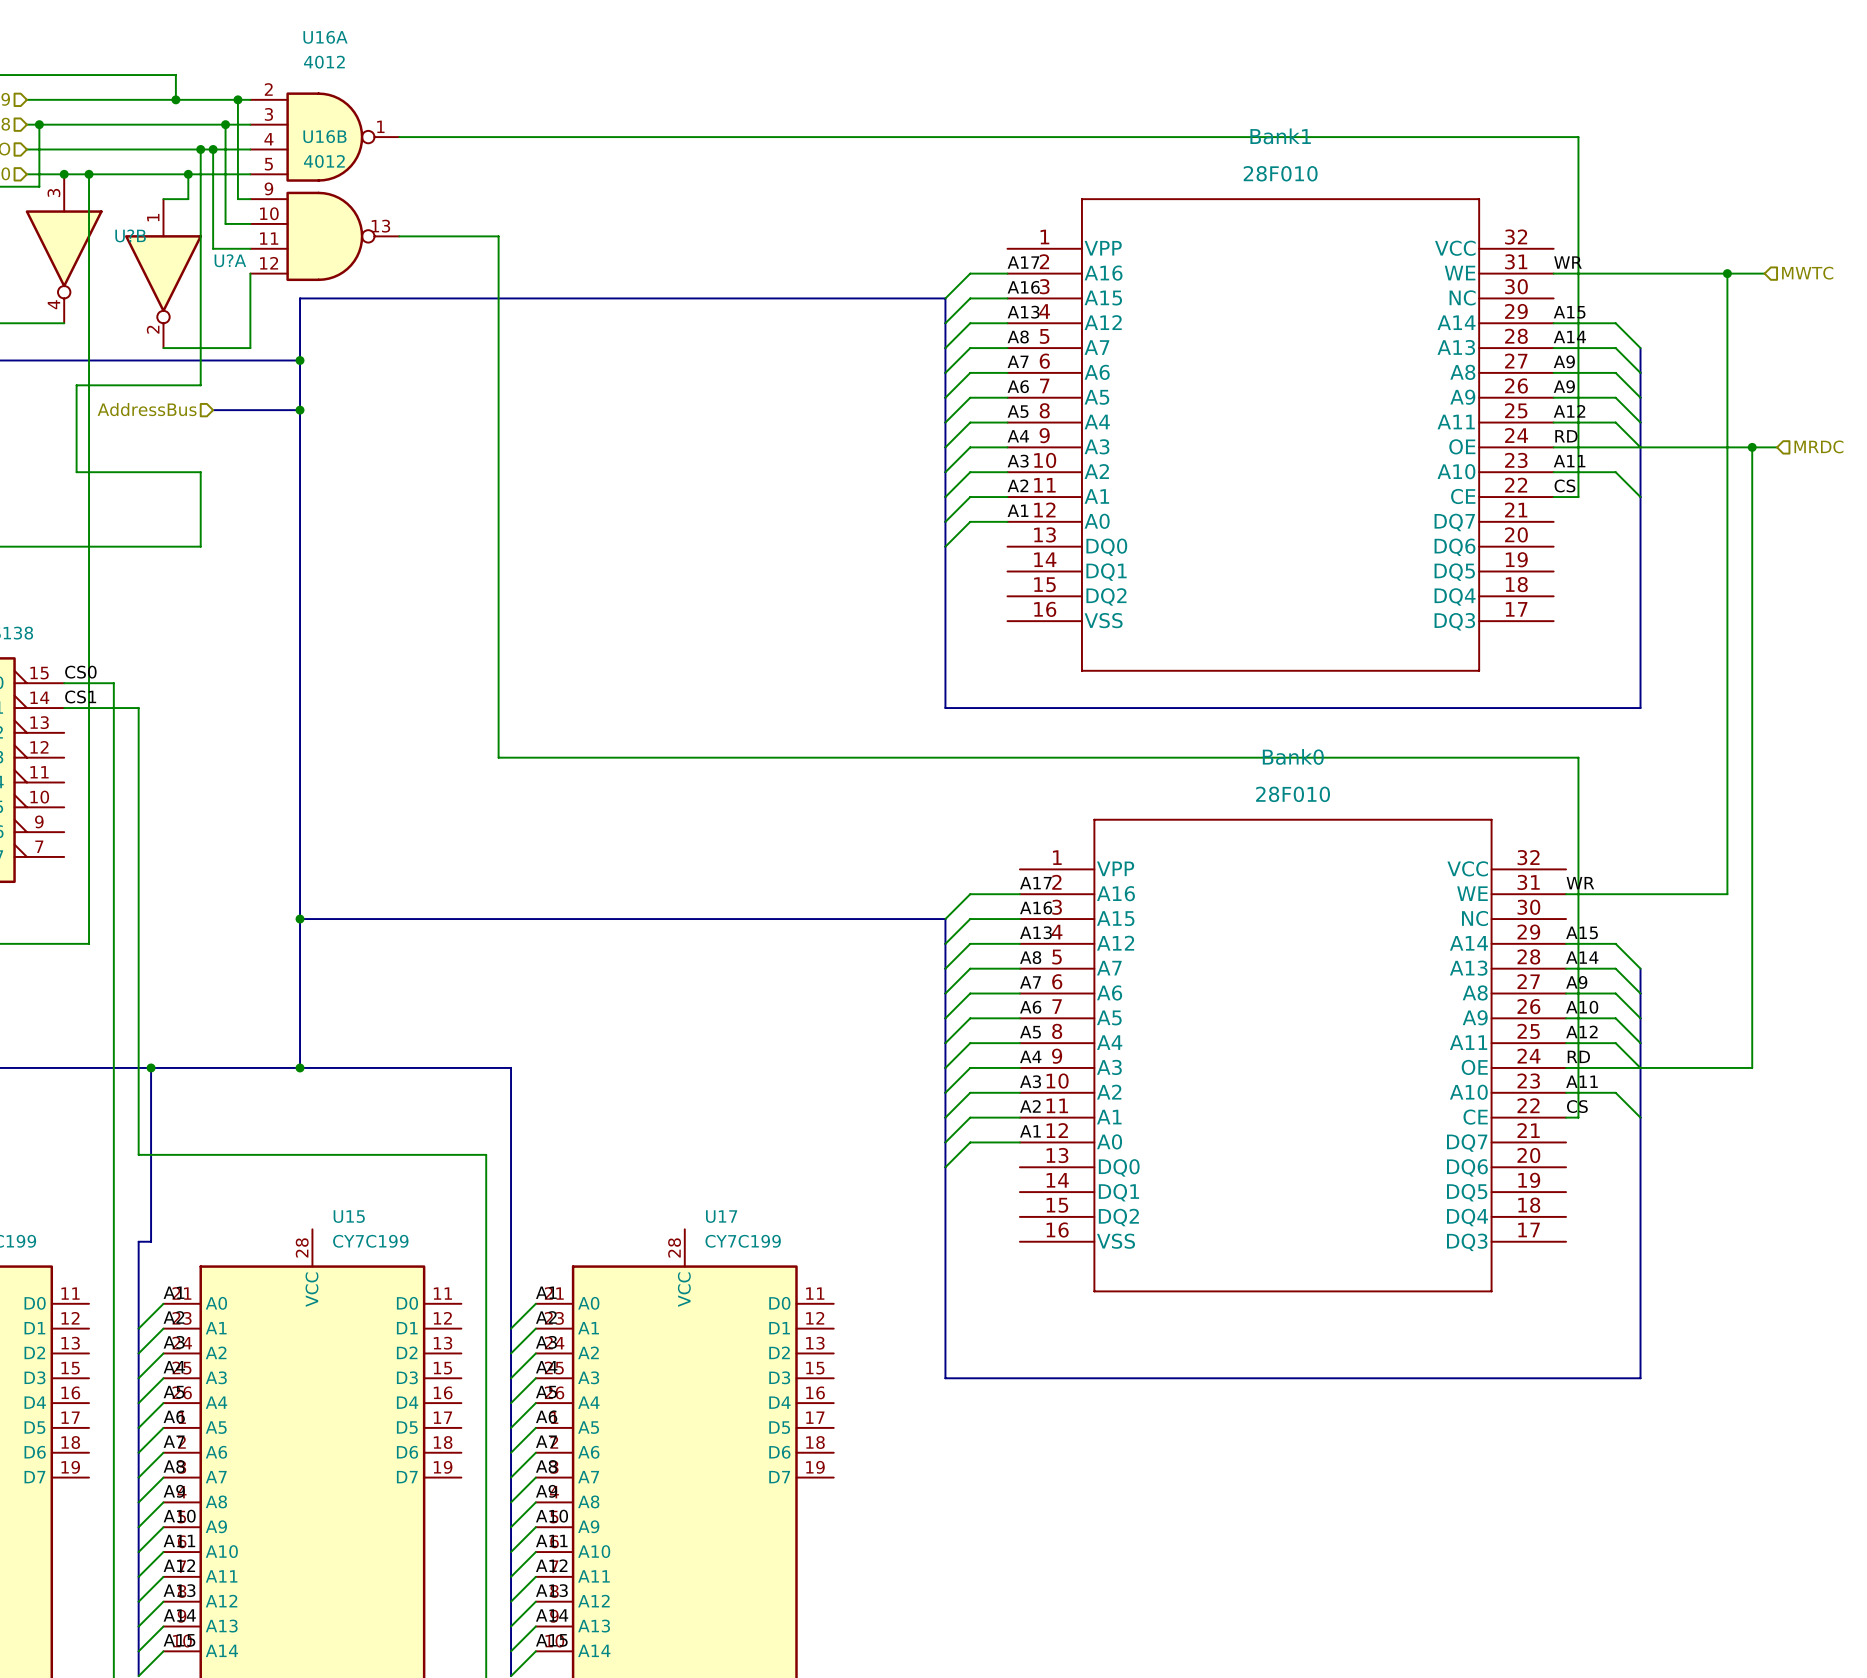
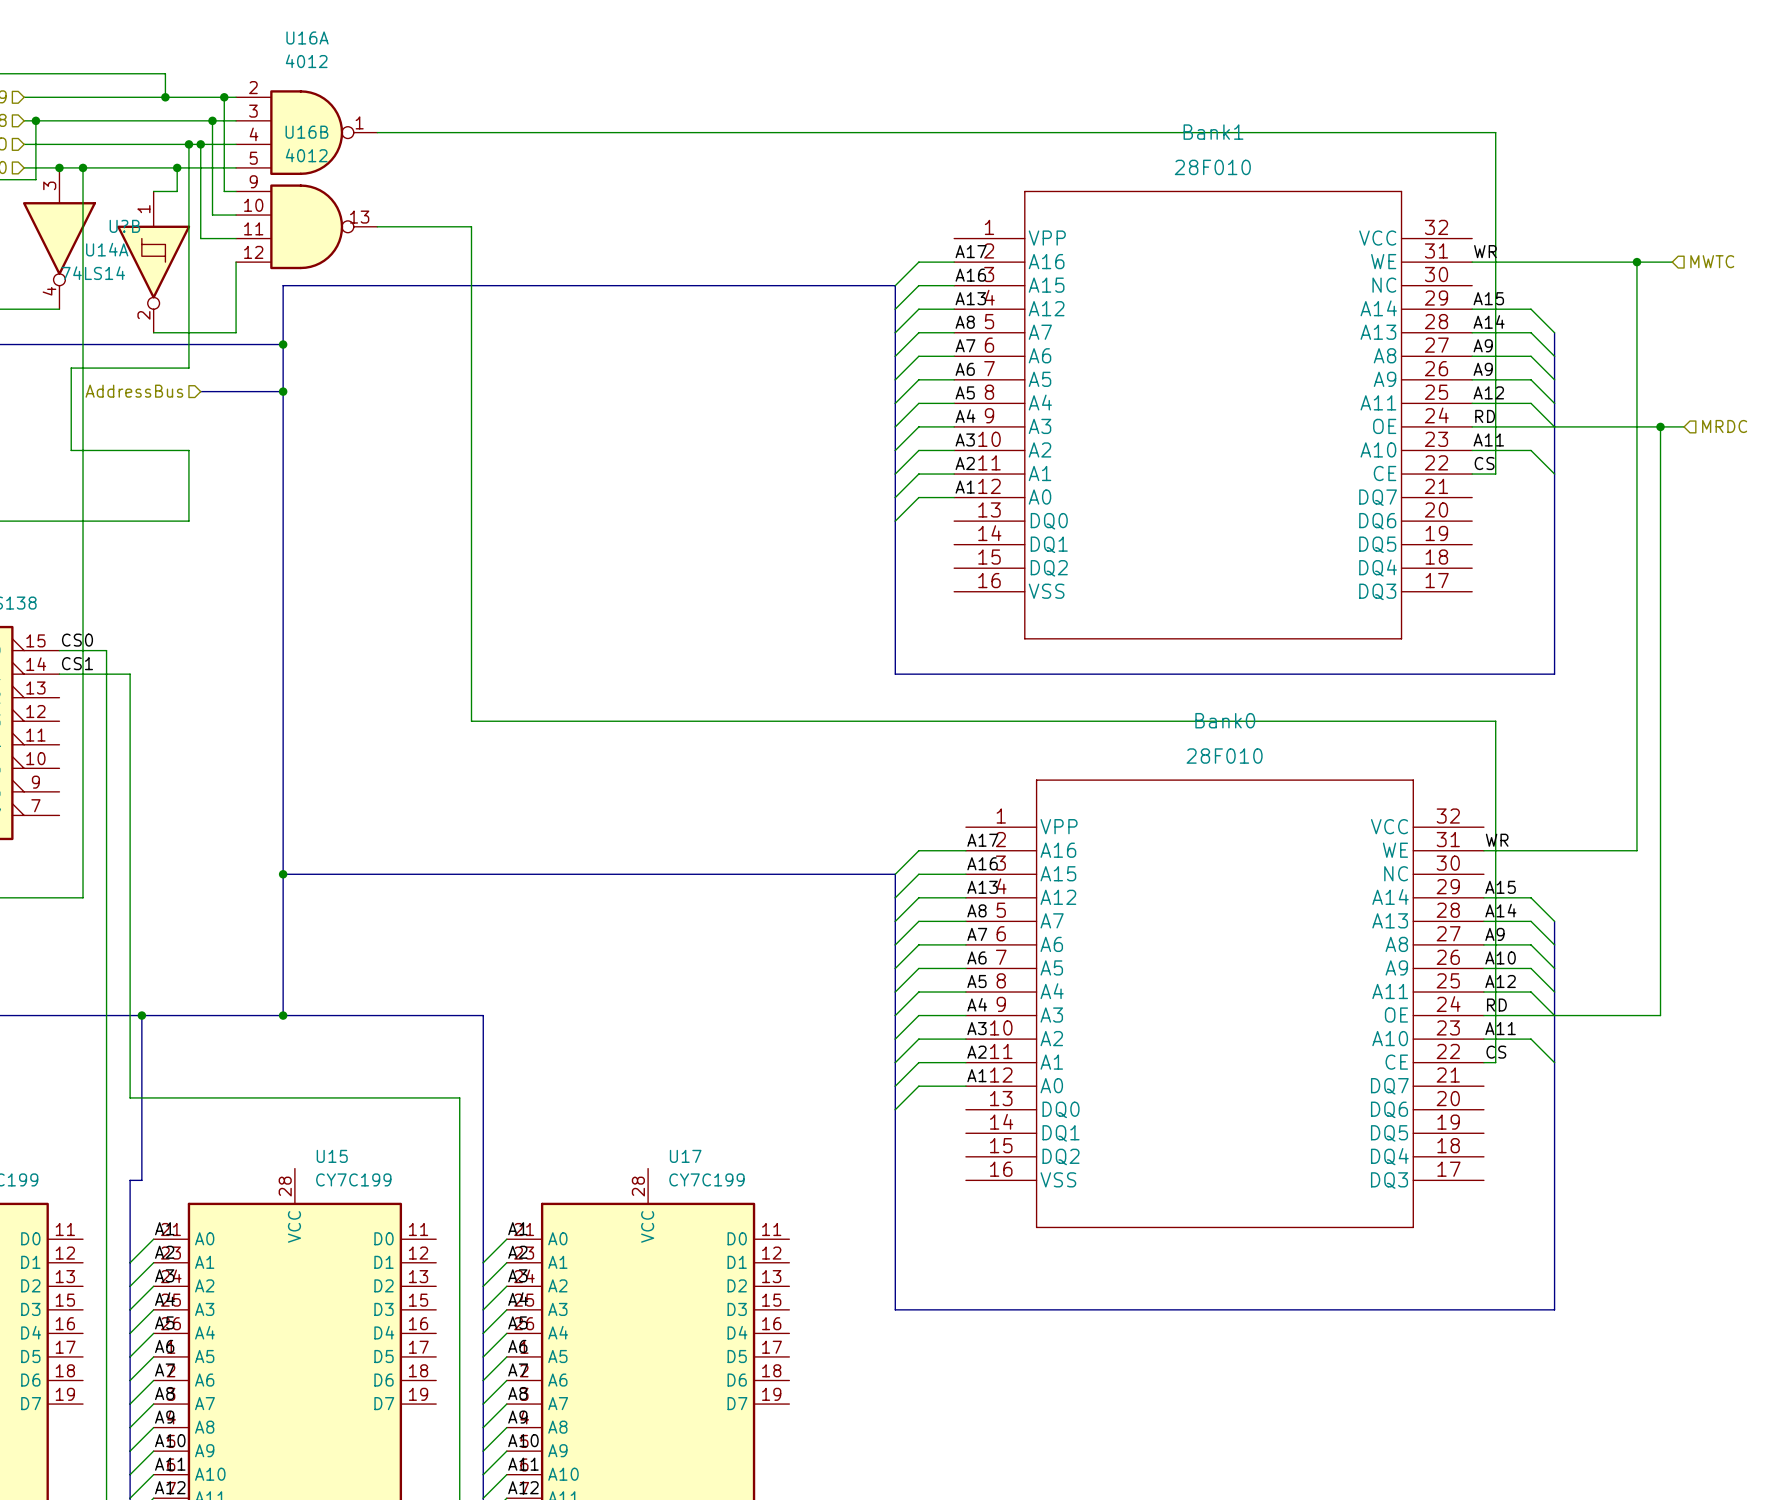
U?A: (163, 273) -> none
U14A: none -> 74LS14 (153, 262)

